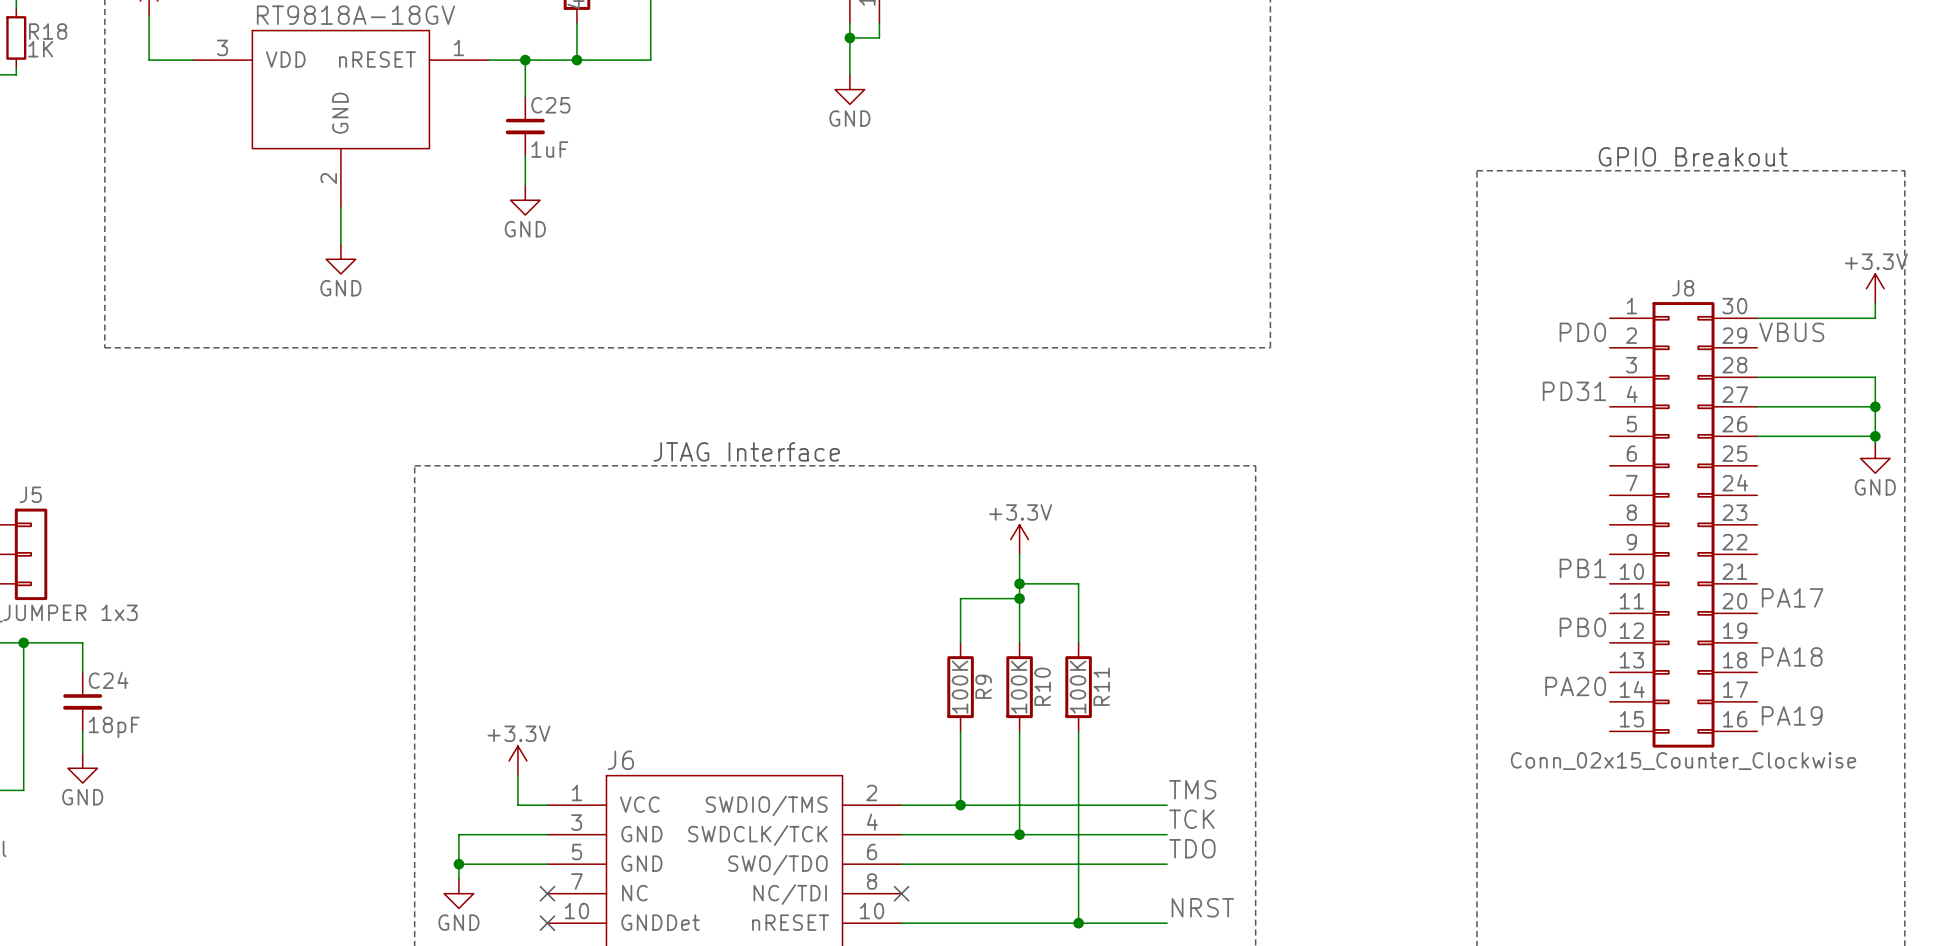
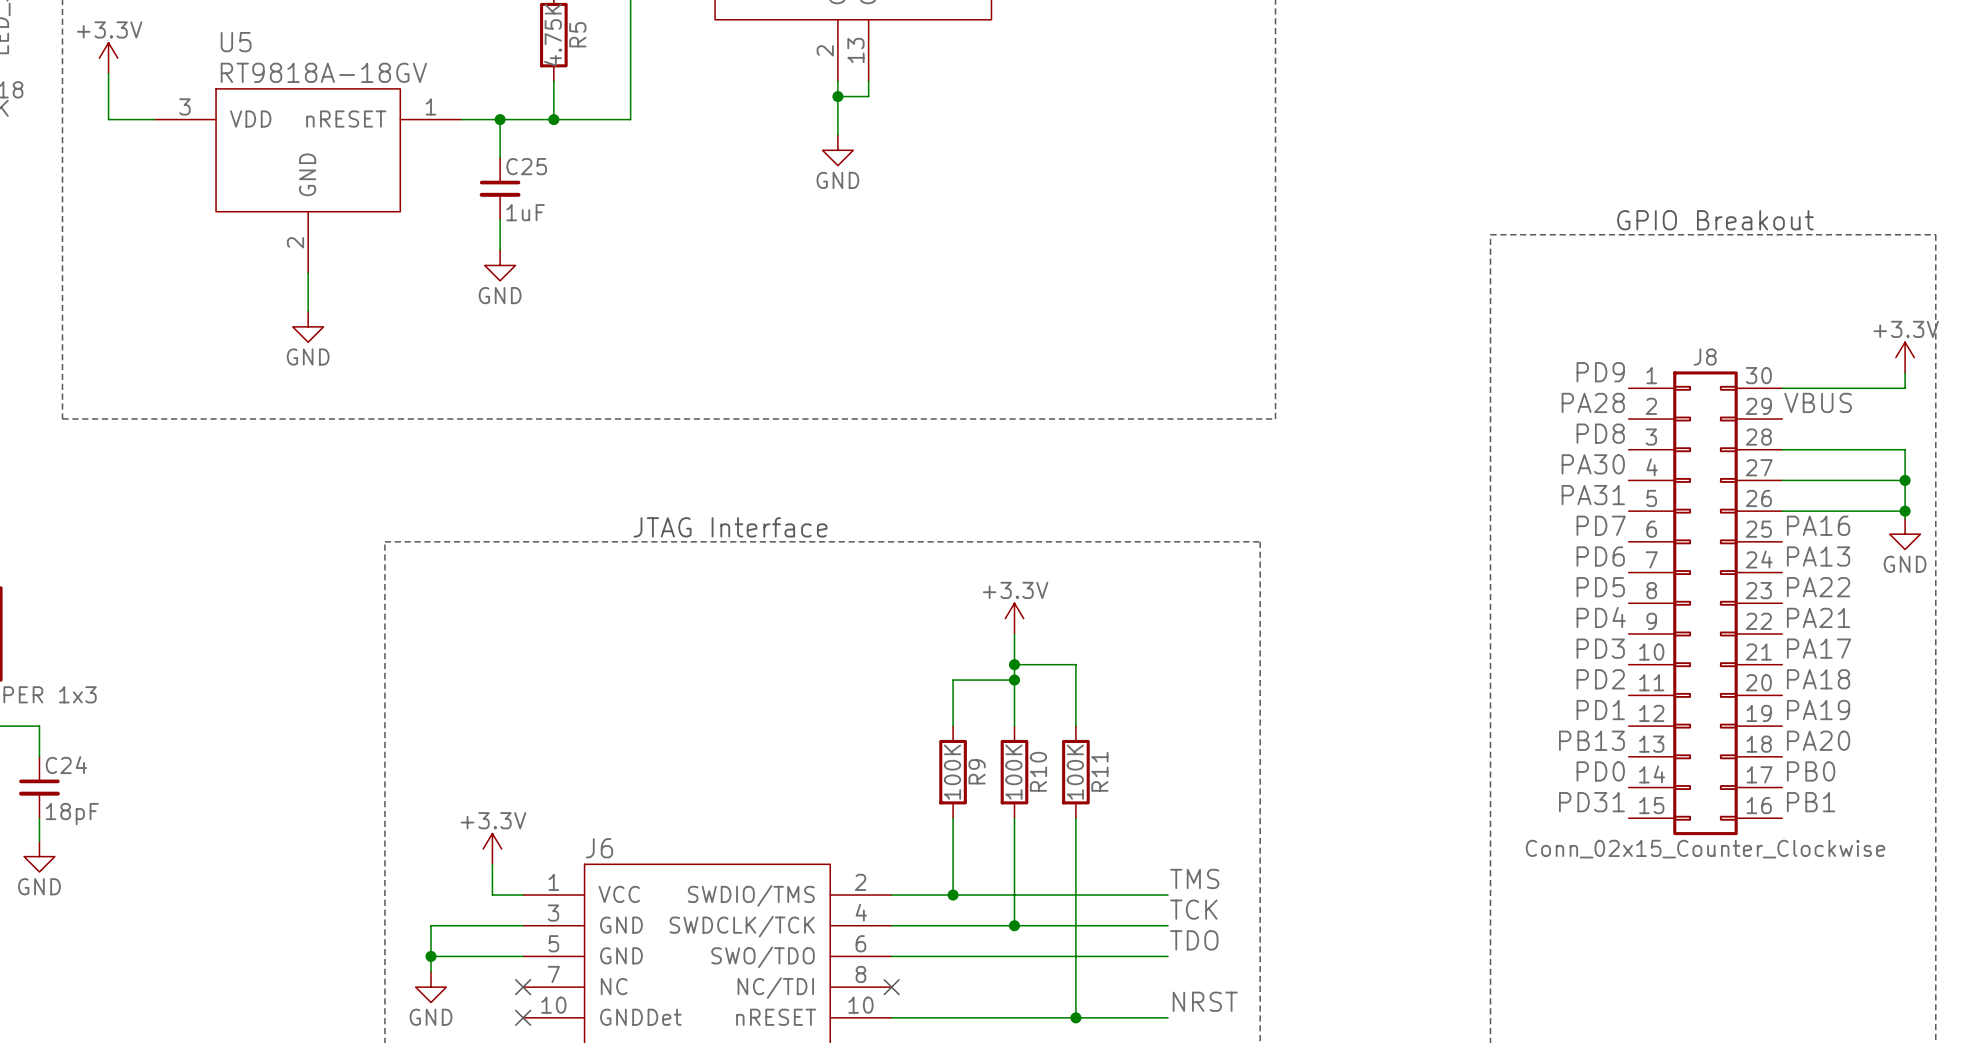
label: none -> PD9 (1600, 372)
label: PD0 (1582, 332) -> PA28 (1593, 402)
label: none -> PD8 (1600, 433)
label: PD31 (1574, 391) -> PA30 (1593, 464)
label: none -> PA31 (1593, 495)
label: none -> PD7 (1601, 525)
label: none -> PA16 (1818, 525)
label: none -> PD6 (1600, 556)
label: none -> PA13 (1818, 556)
label: none -> PD5 (1600, 587)
label: none -> PA22 (1818, 587)
label: none -> PD4 (1601, 617)
label: none -> PA21 (1818, 617)
label: PB1 (1582, 568) -> PD3 (1600, 648)
label: none -> PA17 (1818, 648)
label: none -> PD2 (1600, 679)
label: PA17 (1792, 597) -> PA18 (1818, 679)
label: PB0 (1582, 627) -> PD1 (1600, 710)
label: none -> PA19 (1818, 710)
label: none -> PB13 (1591, 740)
label: PA18 (1792, 656) -> PA20 (1818, 740)
label: PA20 (1575, 686) -> PD0 (1600, 771)
label: none -> PB0 (1811, 771)
label: none -> PD31 (1591, 802)
label: PA19 (1792, 715) -> PB1 (1811, 802)

